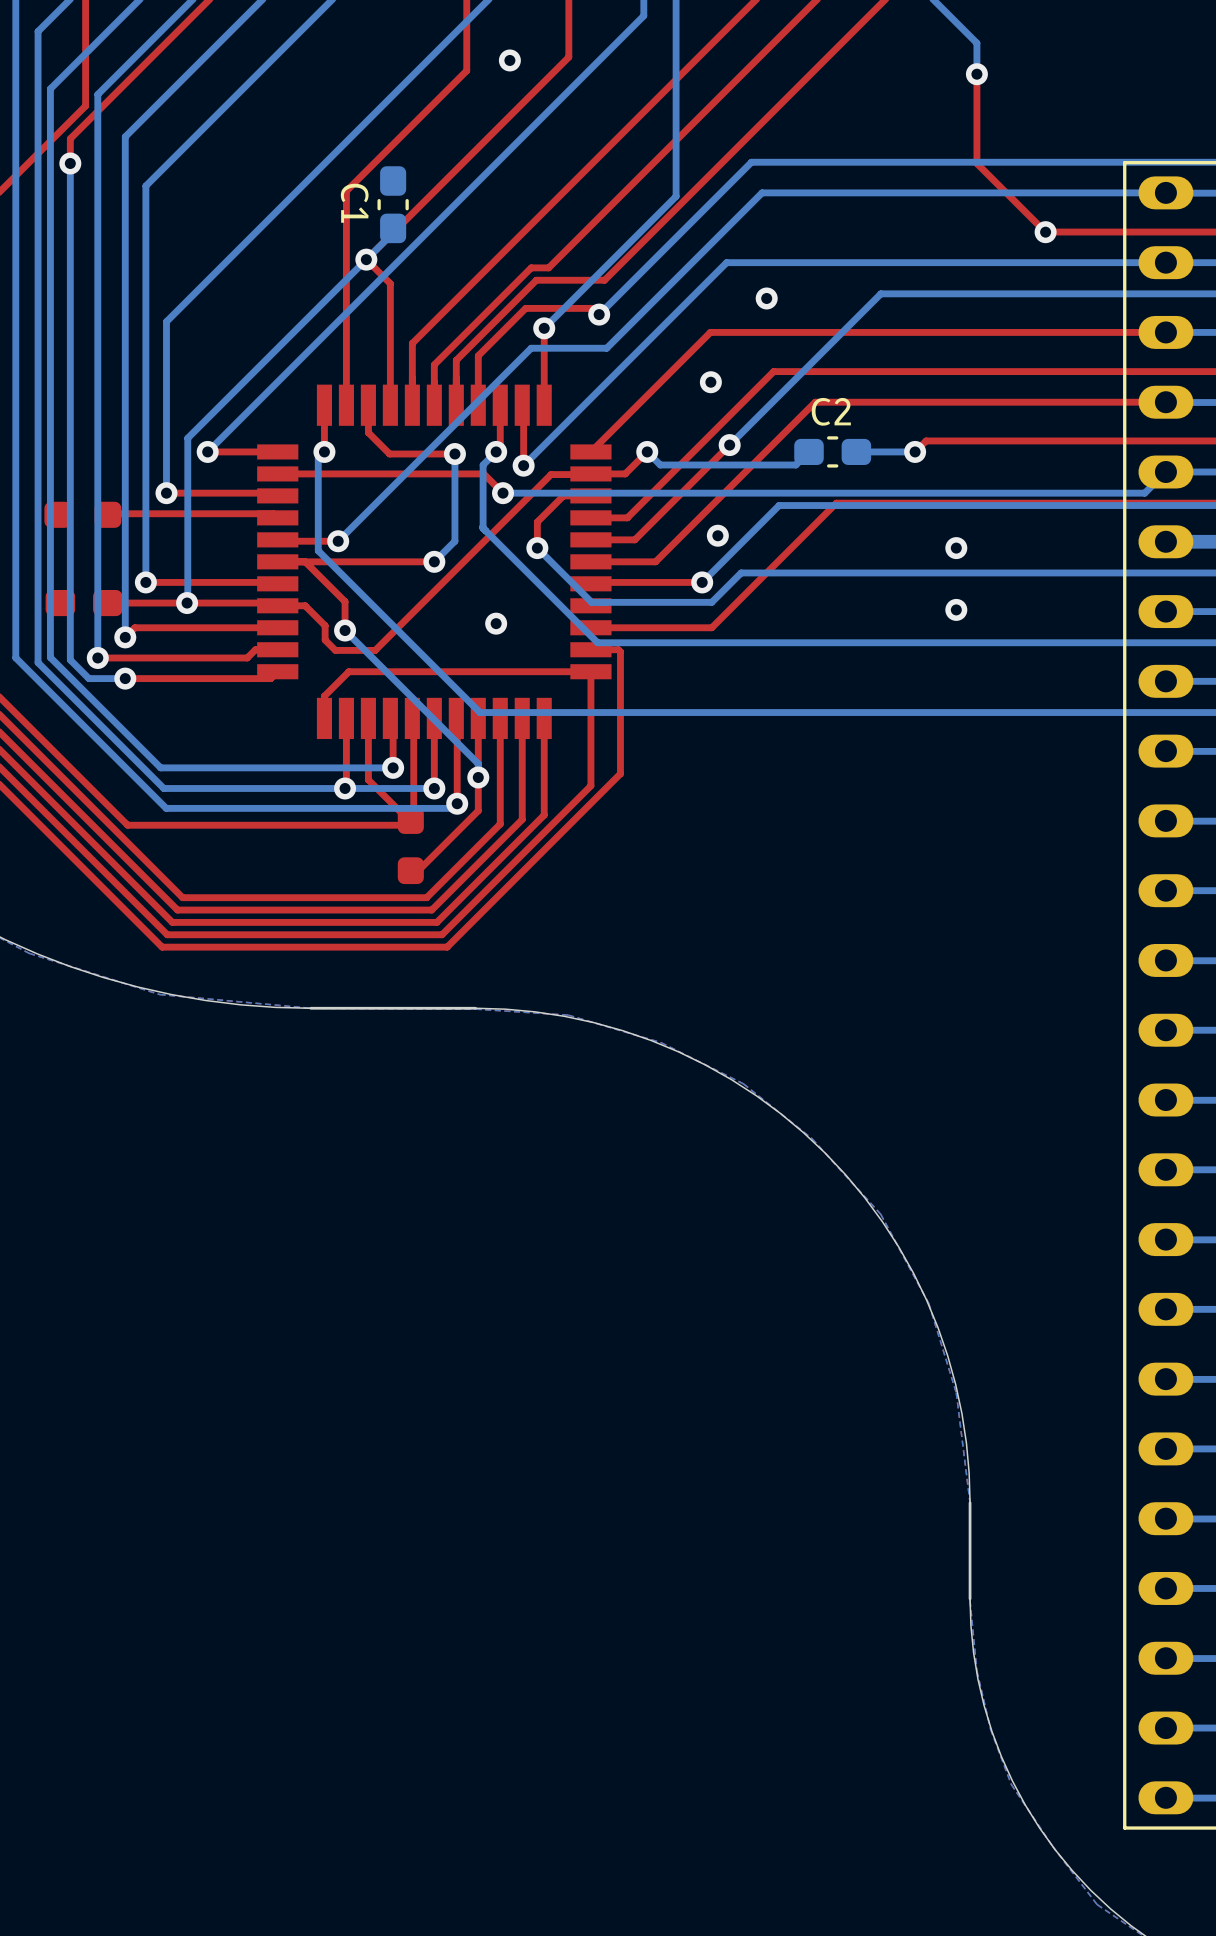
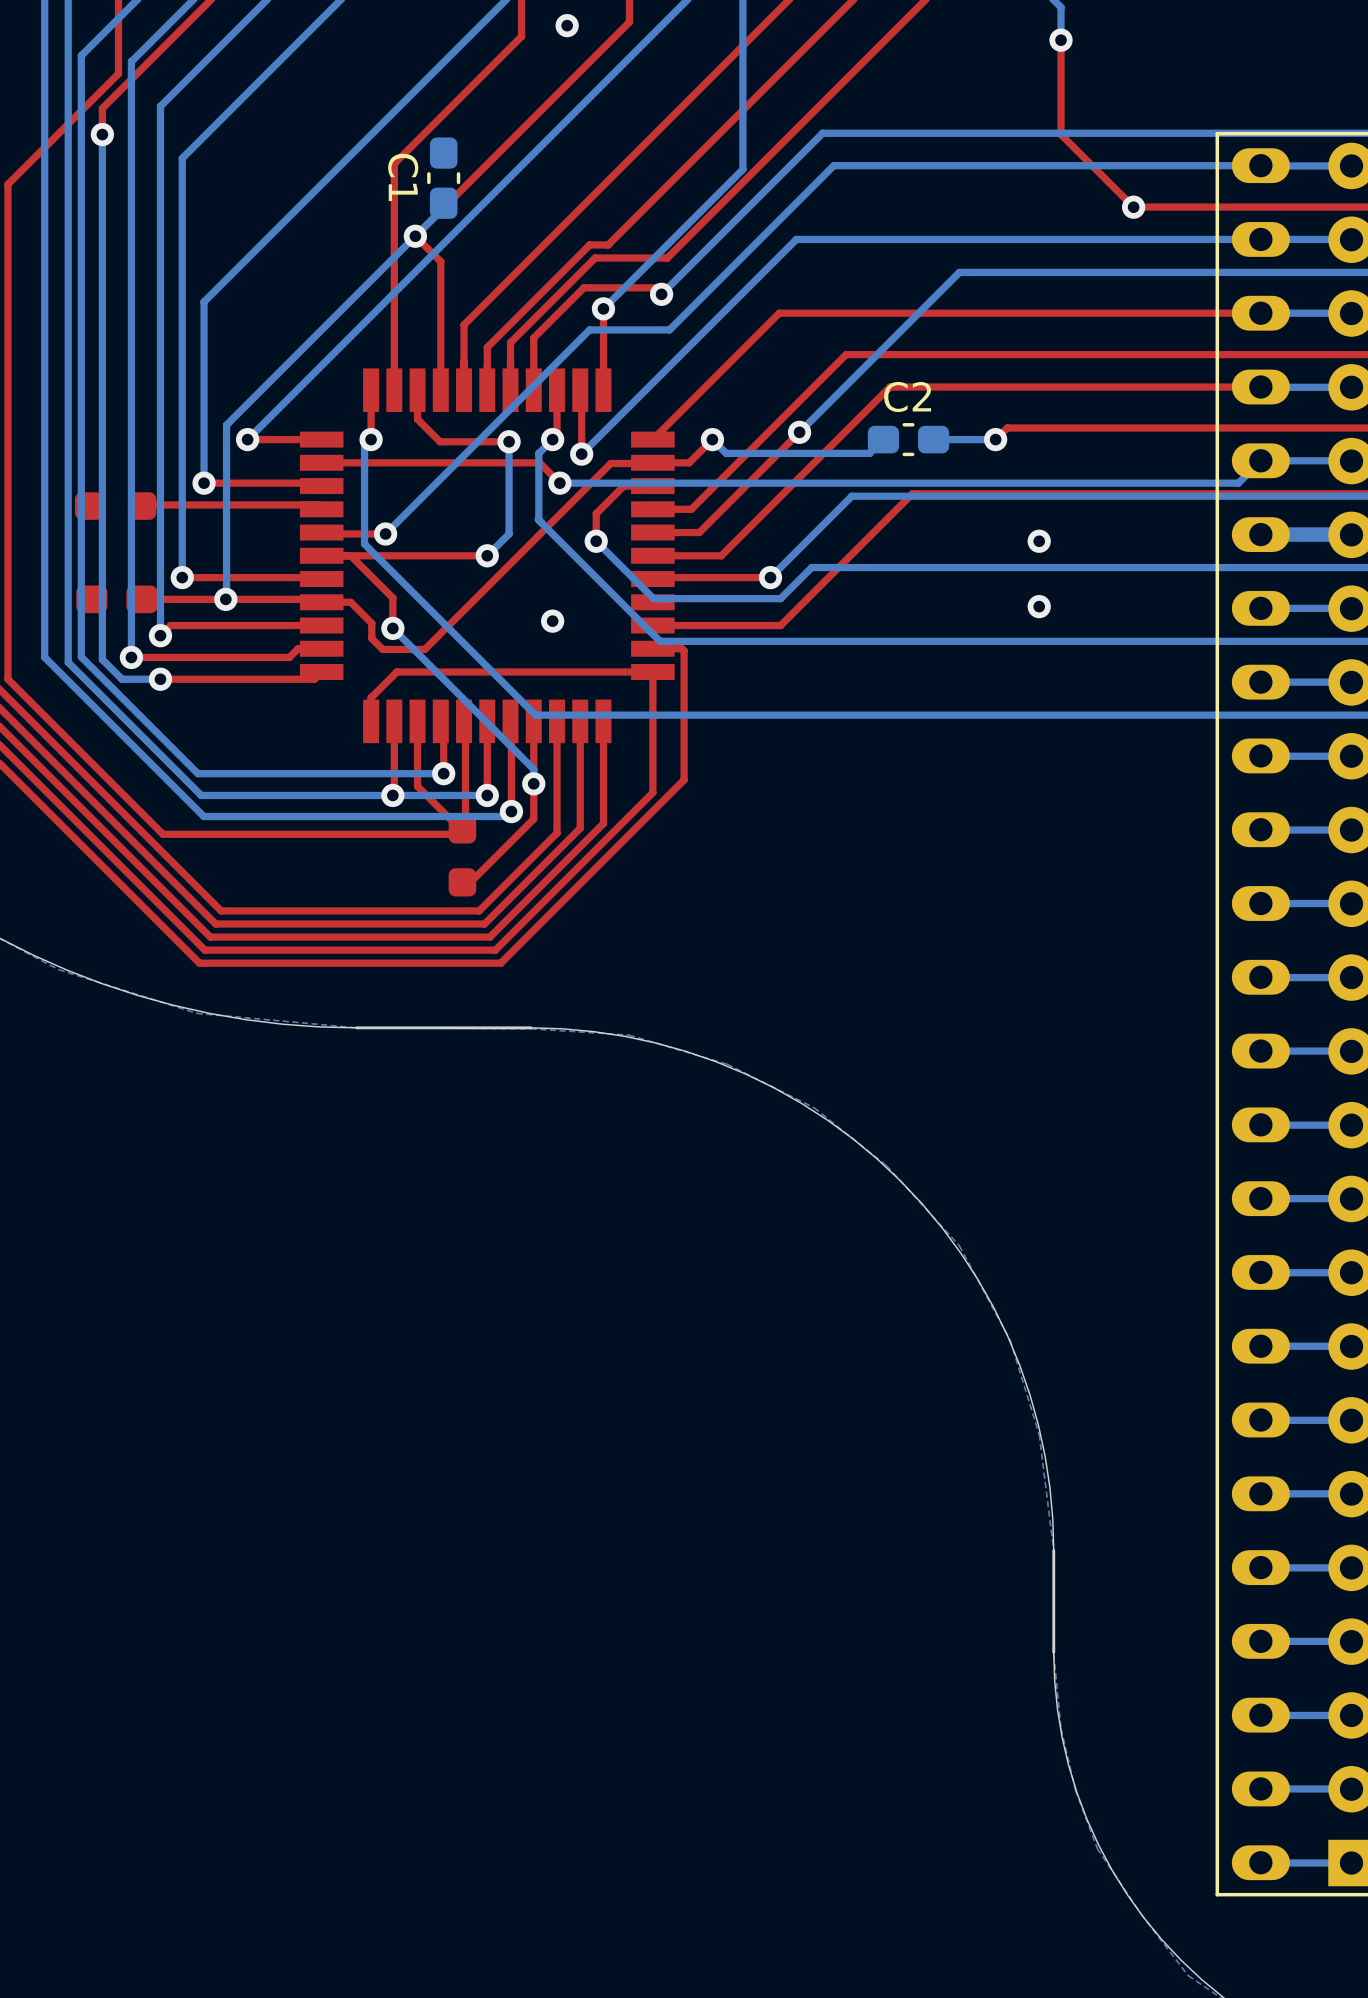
via: (766, 298) -> none
via: (710, 382) -> none
via: (717, 535) -> none

